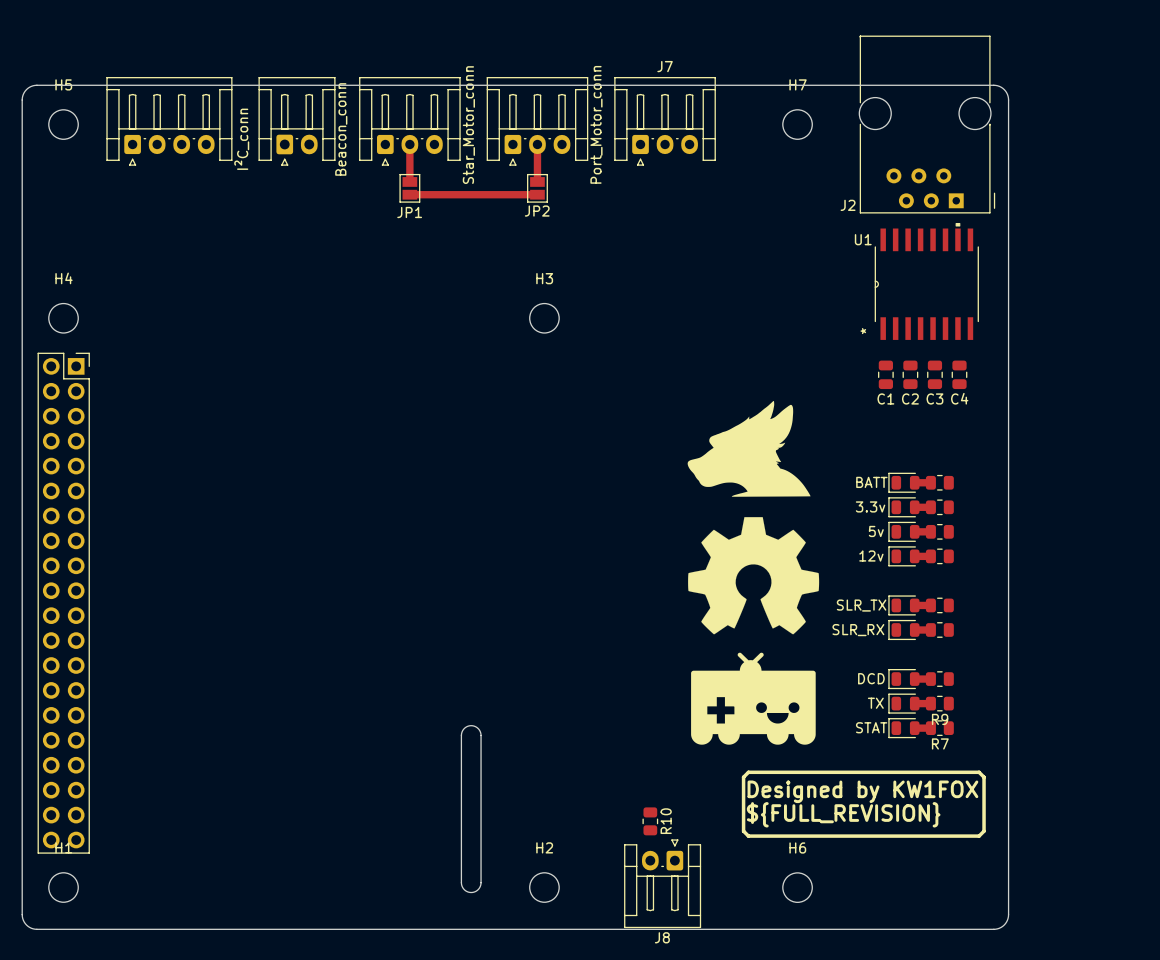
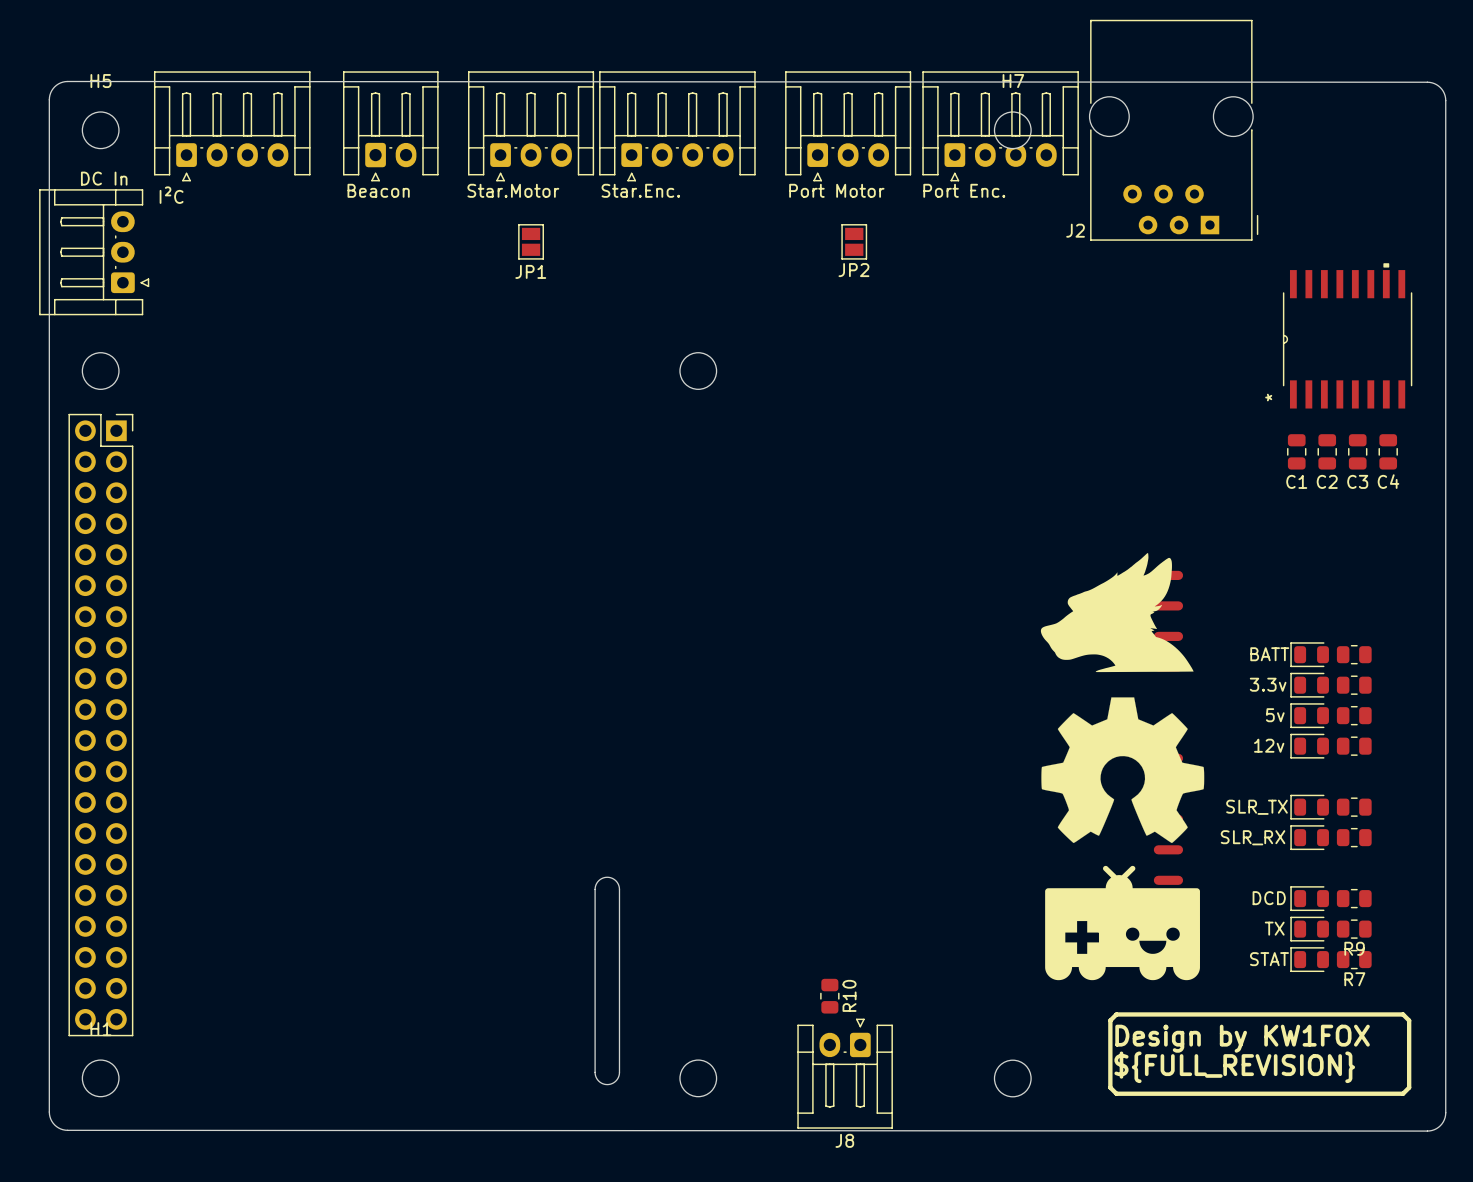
J7 name: J7 (665, 66) -> none
part footprint: [486, 77, 589, 166] -> [599, 71, 756, 182]
board edge: (36, 85) (993, 85) (1004, 89) (1008, 100) (1008, 914) (1002, 926) (993, 929) (36, 929) -> (67, 81) (1427, 82) (1440, 87) (1445, 100) (1445, 1112) (1443, 1121) (1438, 1127) (1427, 1131) (67, 1130)
part: none -> Port Enc. (1000, 126)
part value: Port_Motor_conn (596, 124) -> Star.Enc. (640, 190)
part value: Star_Motor_conn (468, 125) -> Star.Motor (513, 190)
part value: Beacon_conn (341, 129) -> Beacon (378, 190)
part value: I²C_conn (241, 139) -> I²C (171, 195)
track: (409, 144) (409, 181) -> none
track: (537, 144) (537, 181) -> none
J7 value: none -> Port Motor (836, 190)
JP1 position: (409, 188) -> (531, 241)
JP2 position: (537, 188) -> (854, 241)
track: (409, 194) (537, 194) -> none
part: none -> DC In (94, 252)
H4 name: H4 (63, 278) -> none
H3 name: H3 (544, 278) -> none
U1: (926, 281) -> none
part: none -> (1347, 335)
C1 position: (885, 374) -> (1296, 451)
C2 position: (910, 374) -> (1327, 451)
C3 position: (934, 374) -> (1357, 451)
C4 position: (959, 374) -> (1388, 451)
part position: (749, 448) -> (1117, 612)
part position: (903, 482) -> (1309, 654)
part: (939, 482) -> none
part position: (903, 507) -> (1309, 685)
part: (939, 507) -> none
part position: (903, 531) -> (1309, 715)
part: (939, 531) -> none
part: none -> (1354, 654)
part position: (903, 556) -> (1309, 746)
part: (939, 556) -> none
part: none -> (1354, 685)
drawing position: (753, 575) -> (1122, 770)
part: none -> (1354, 715)
part position: (903, 605) -> (1309, 807)
part: (939, 605) -> none
part: none -> (1354, 746)
part position: (903, 629) -> (1309, 837)
part: (939, 629) -> none
part: none -> (1354, 807)
part position: (903, 679) -> (1309, 898)
part: (939, 679) -> none
part: none -> (1354, 837)
part position: (753, 698) -> (1122, 923)
part position: (903, 703) -> (1309, 929)
R9 position: (939, 703) -> (1354, 929)
part position: (903, 728) -> (1309, 959)
R7 position: (939, 728) -> (1354, 959)
part: none -> (1354, 898)
text: Designed by KW1FOX (862, 791) -> none
text position: ${FULL_REVISION} (843, 814) -> ${FULL_REVISION} (1234, 1067)
line: (880, 836) (748, 836) (743, 831) (743, 777) (748, 772) (979, 772) (984, 777) (984, 831) (979, 836) -> (1116, 1014) (1110, 1020) (1110, 1087) (1116, 1093) (1403, 1093) (1409, 1087) (1409, 1020) (1403, 1014) (1238, 1014)
H2 name: H2 (544, 847) -> none
H6 name: H6 (797, 847) -> none
text: none -> Design by KW1FOX (1242, 1038)

